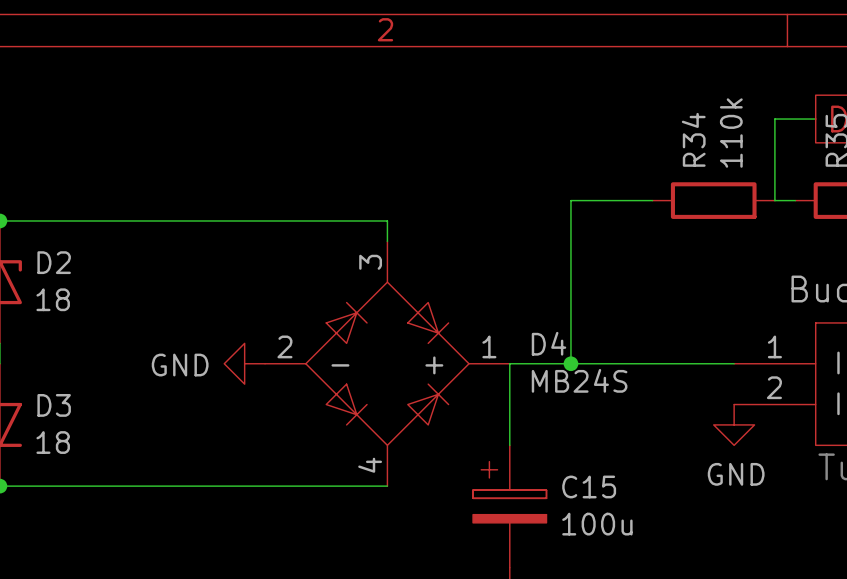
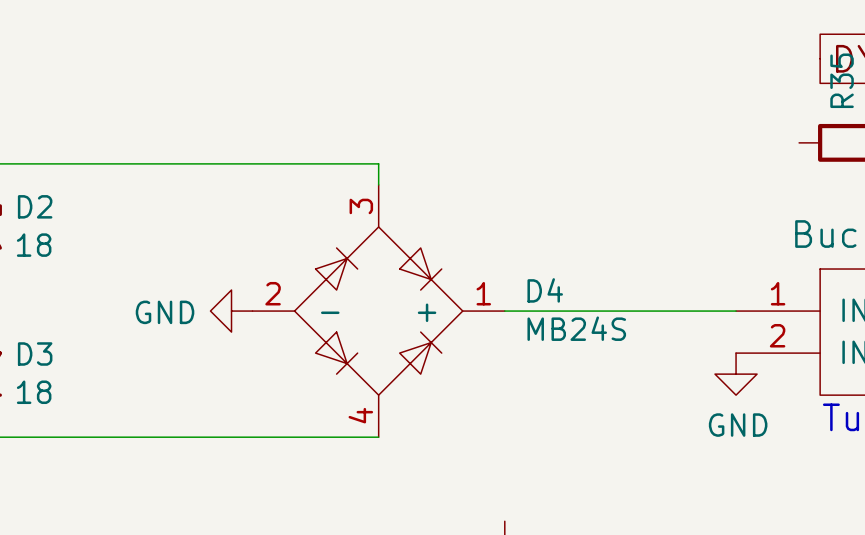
wire: (815, 119) (774, 119) (774, 200) (795, 200) -> none
wire: (652, 200) (570, 200) (570, 363) -> none
R34: 110k (713, 200) -> none
wire: (509, 363) (509, 445) -> none
junction: (570, 363) -> none
C15: 100u (509, 506) -> none

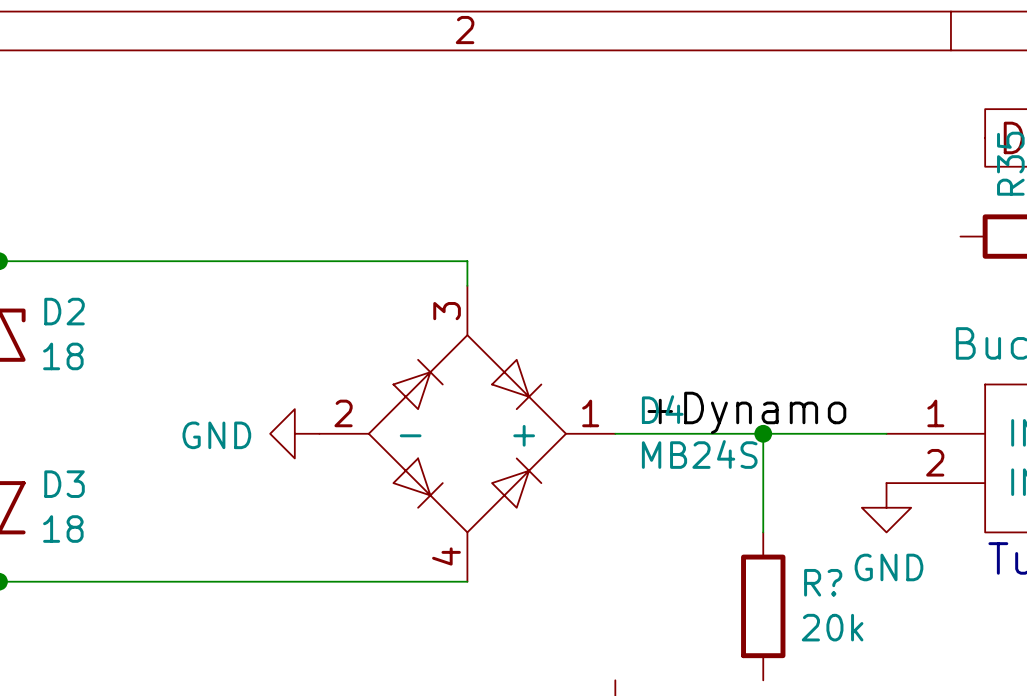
label: none -> +Dynamo (746, 412)
wire: none -> (763, 433) (763, 532)
junction: none -> (763, 433)
R?: none -> 20k (763, 606)

